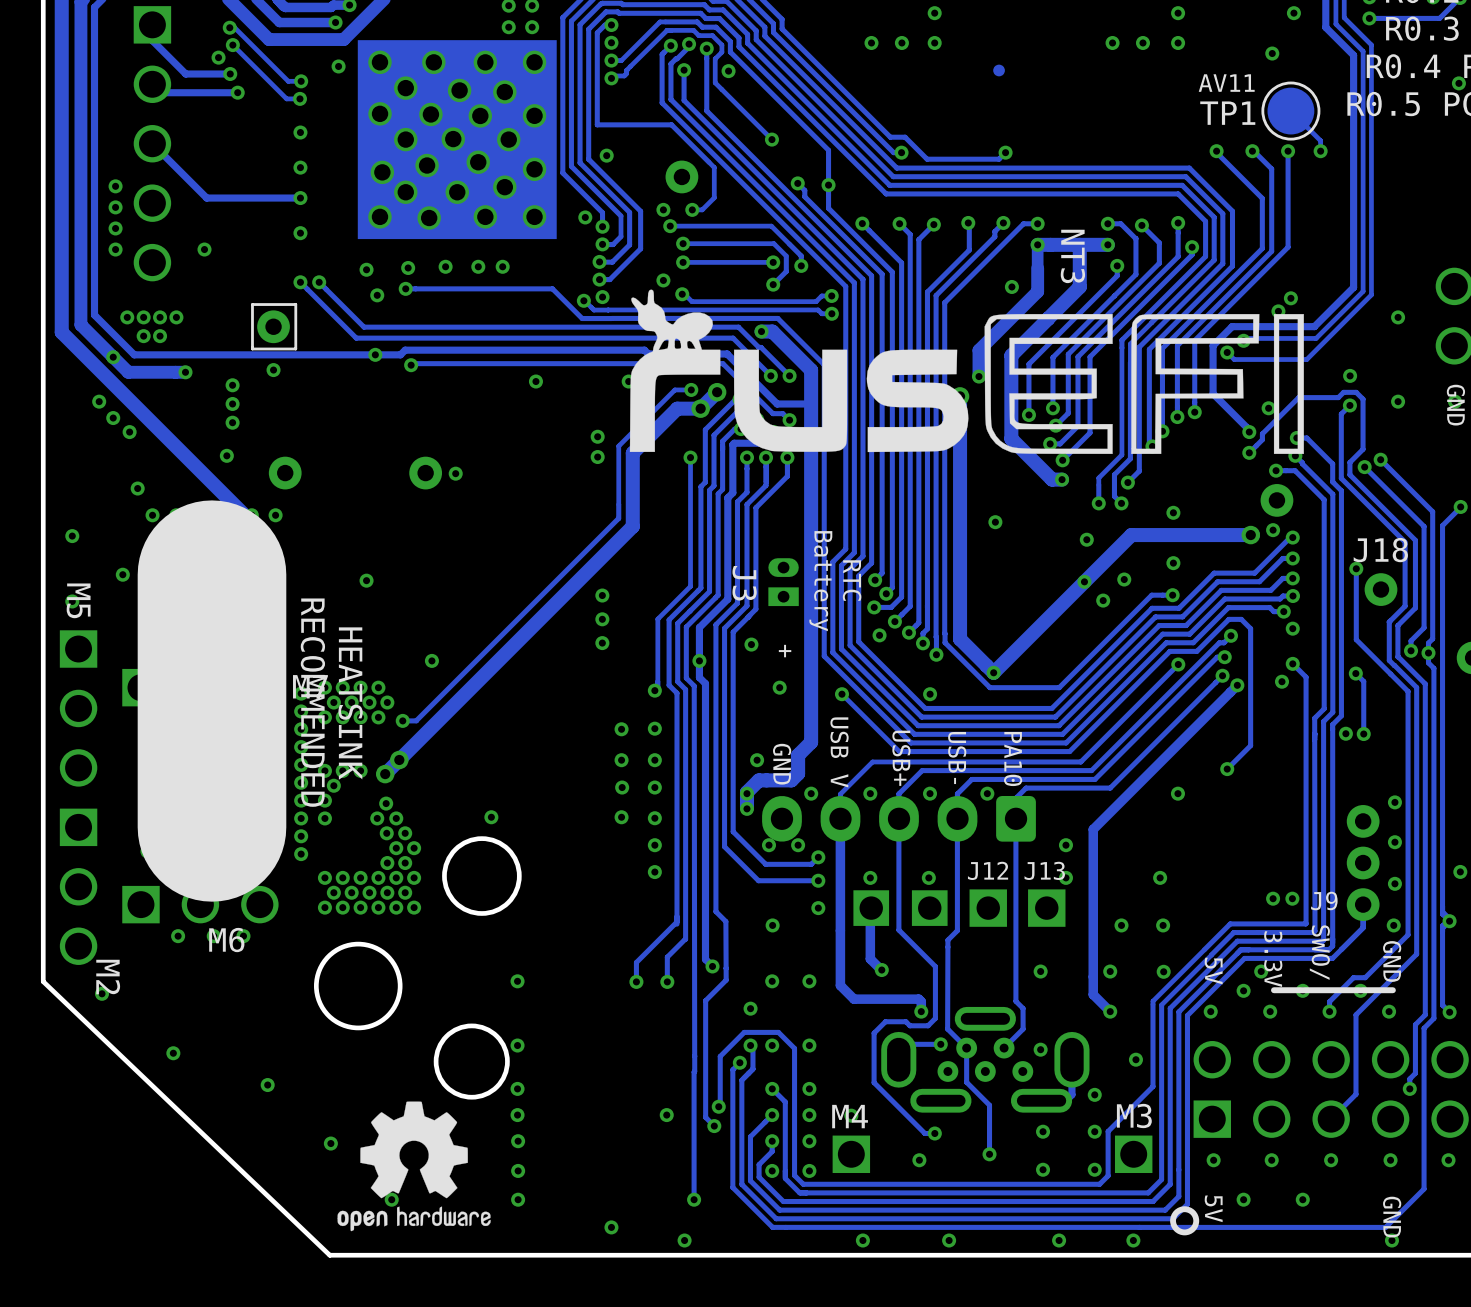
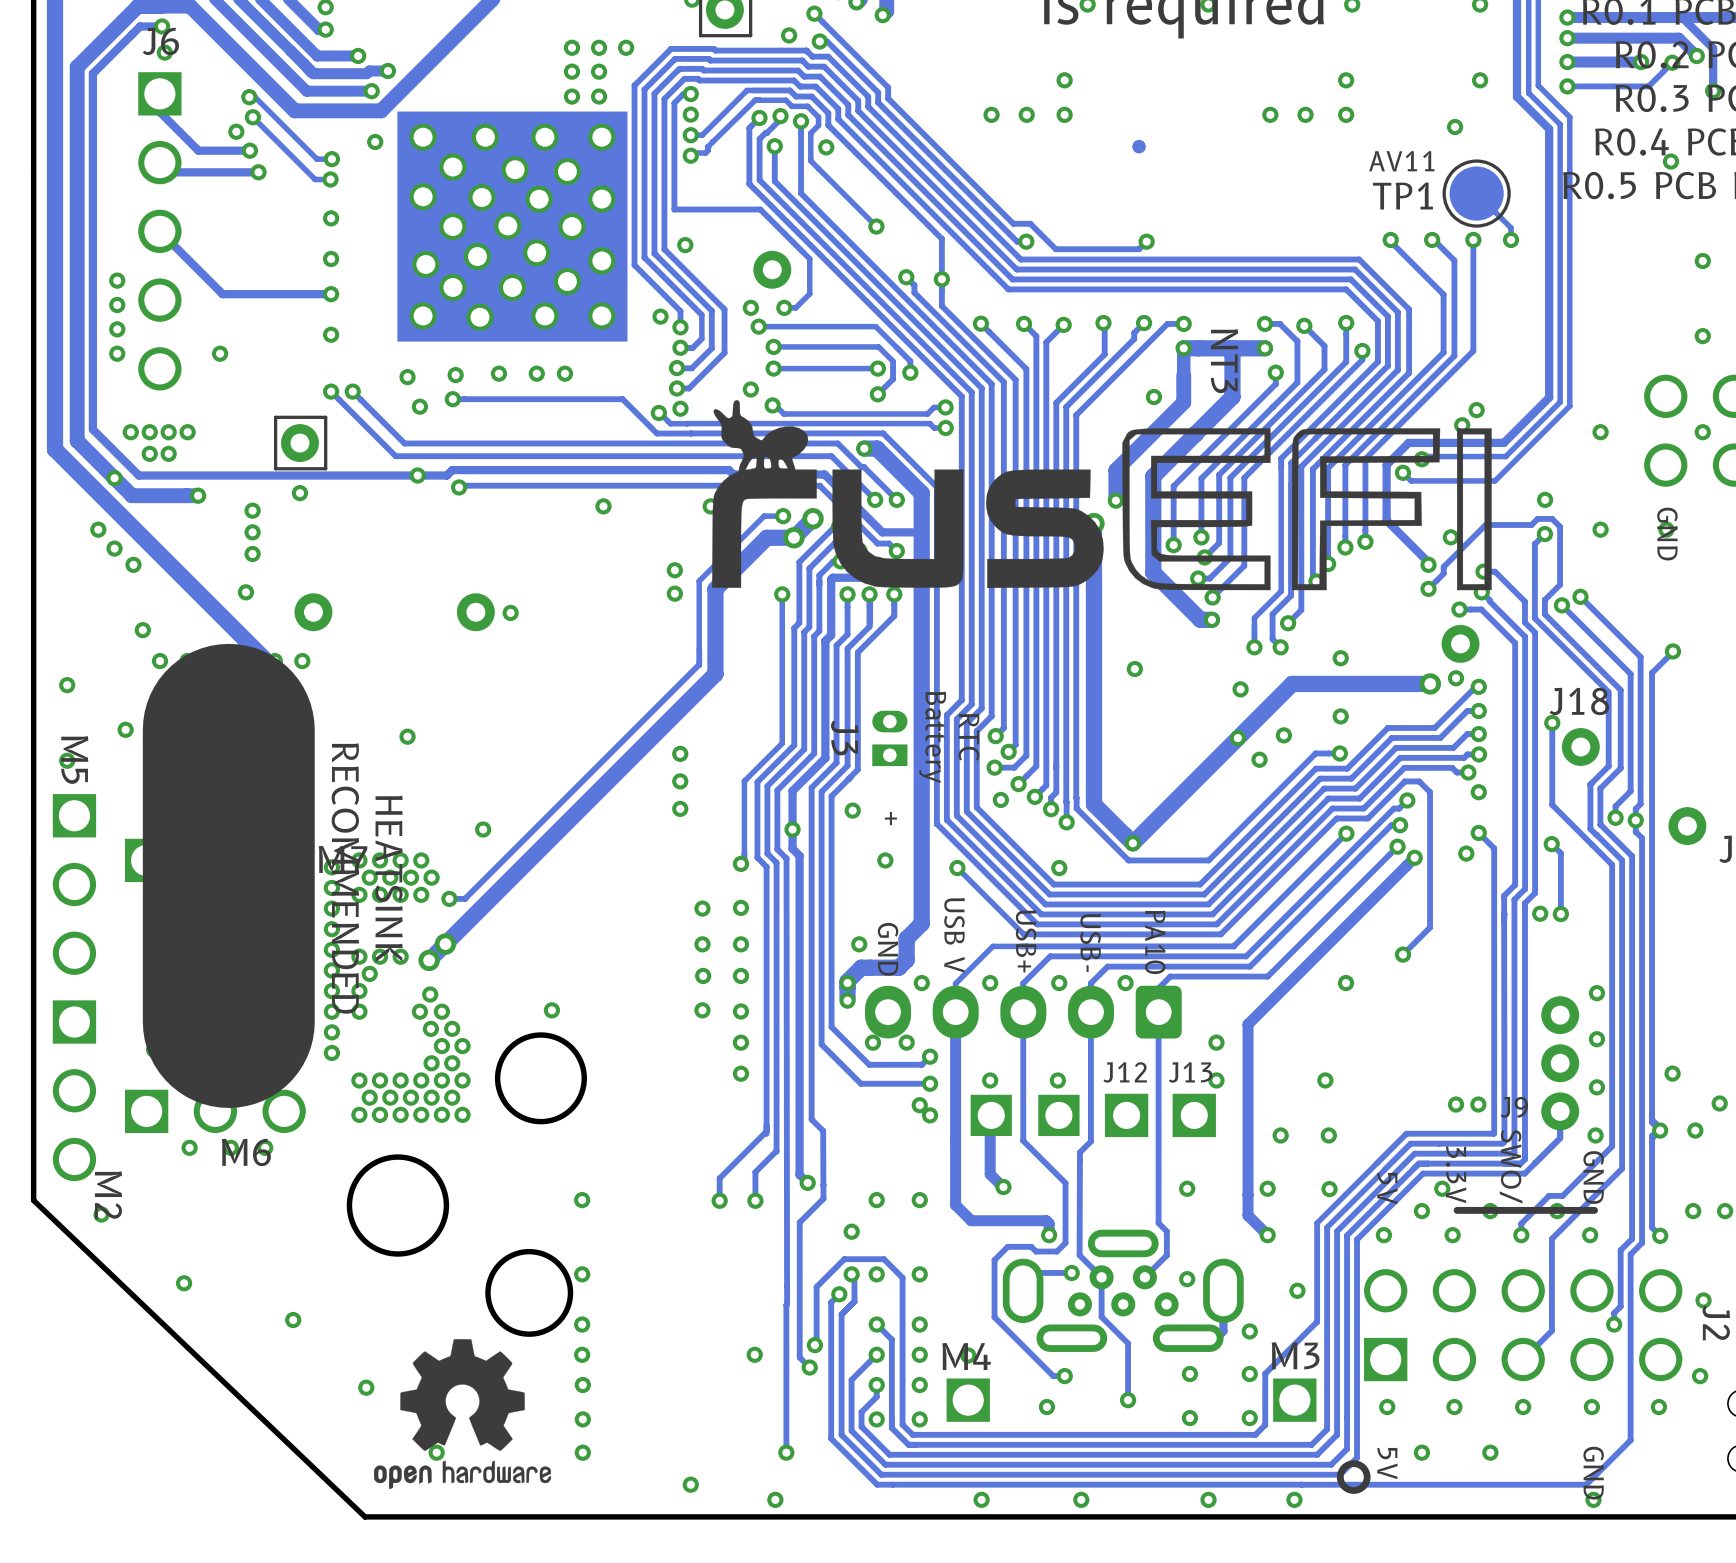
via position: (772, 925) -> (919, 1105)

